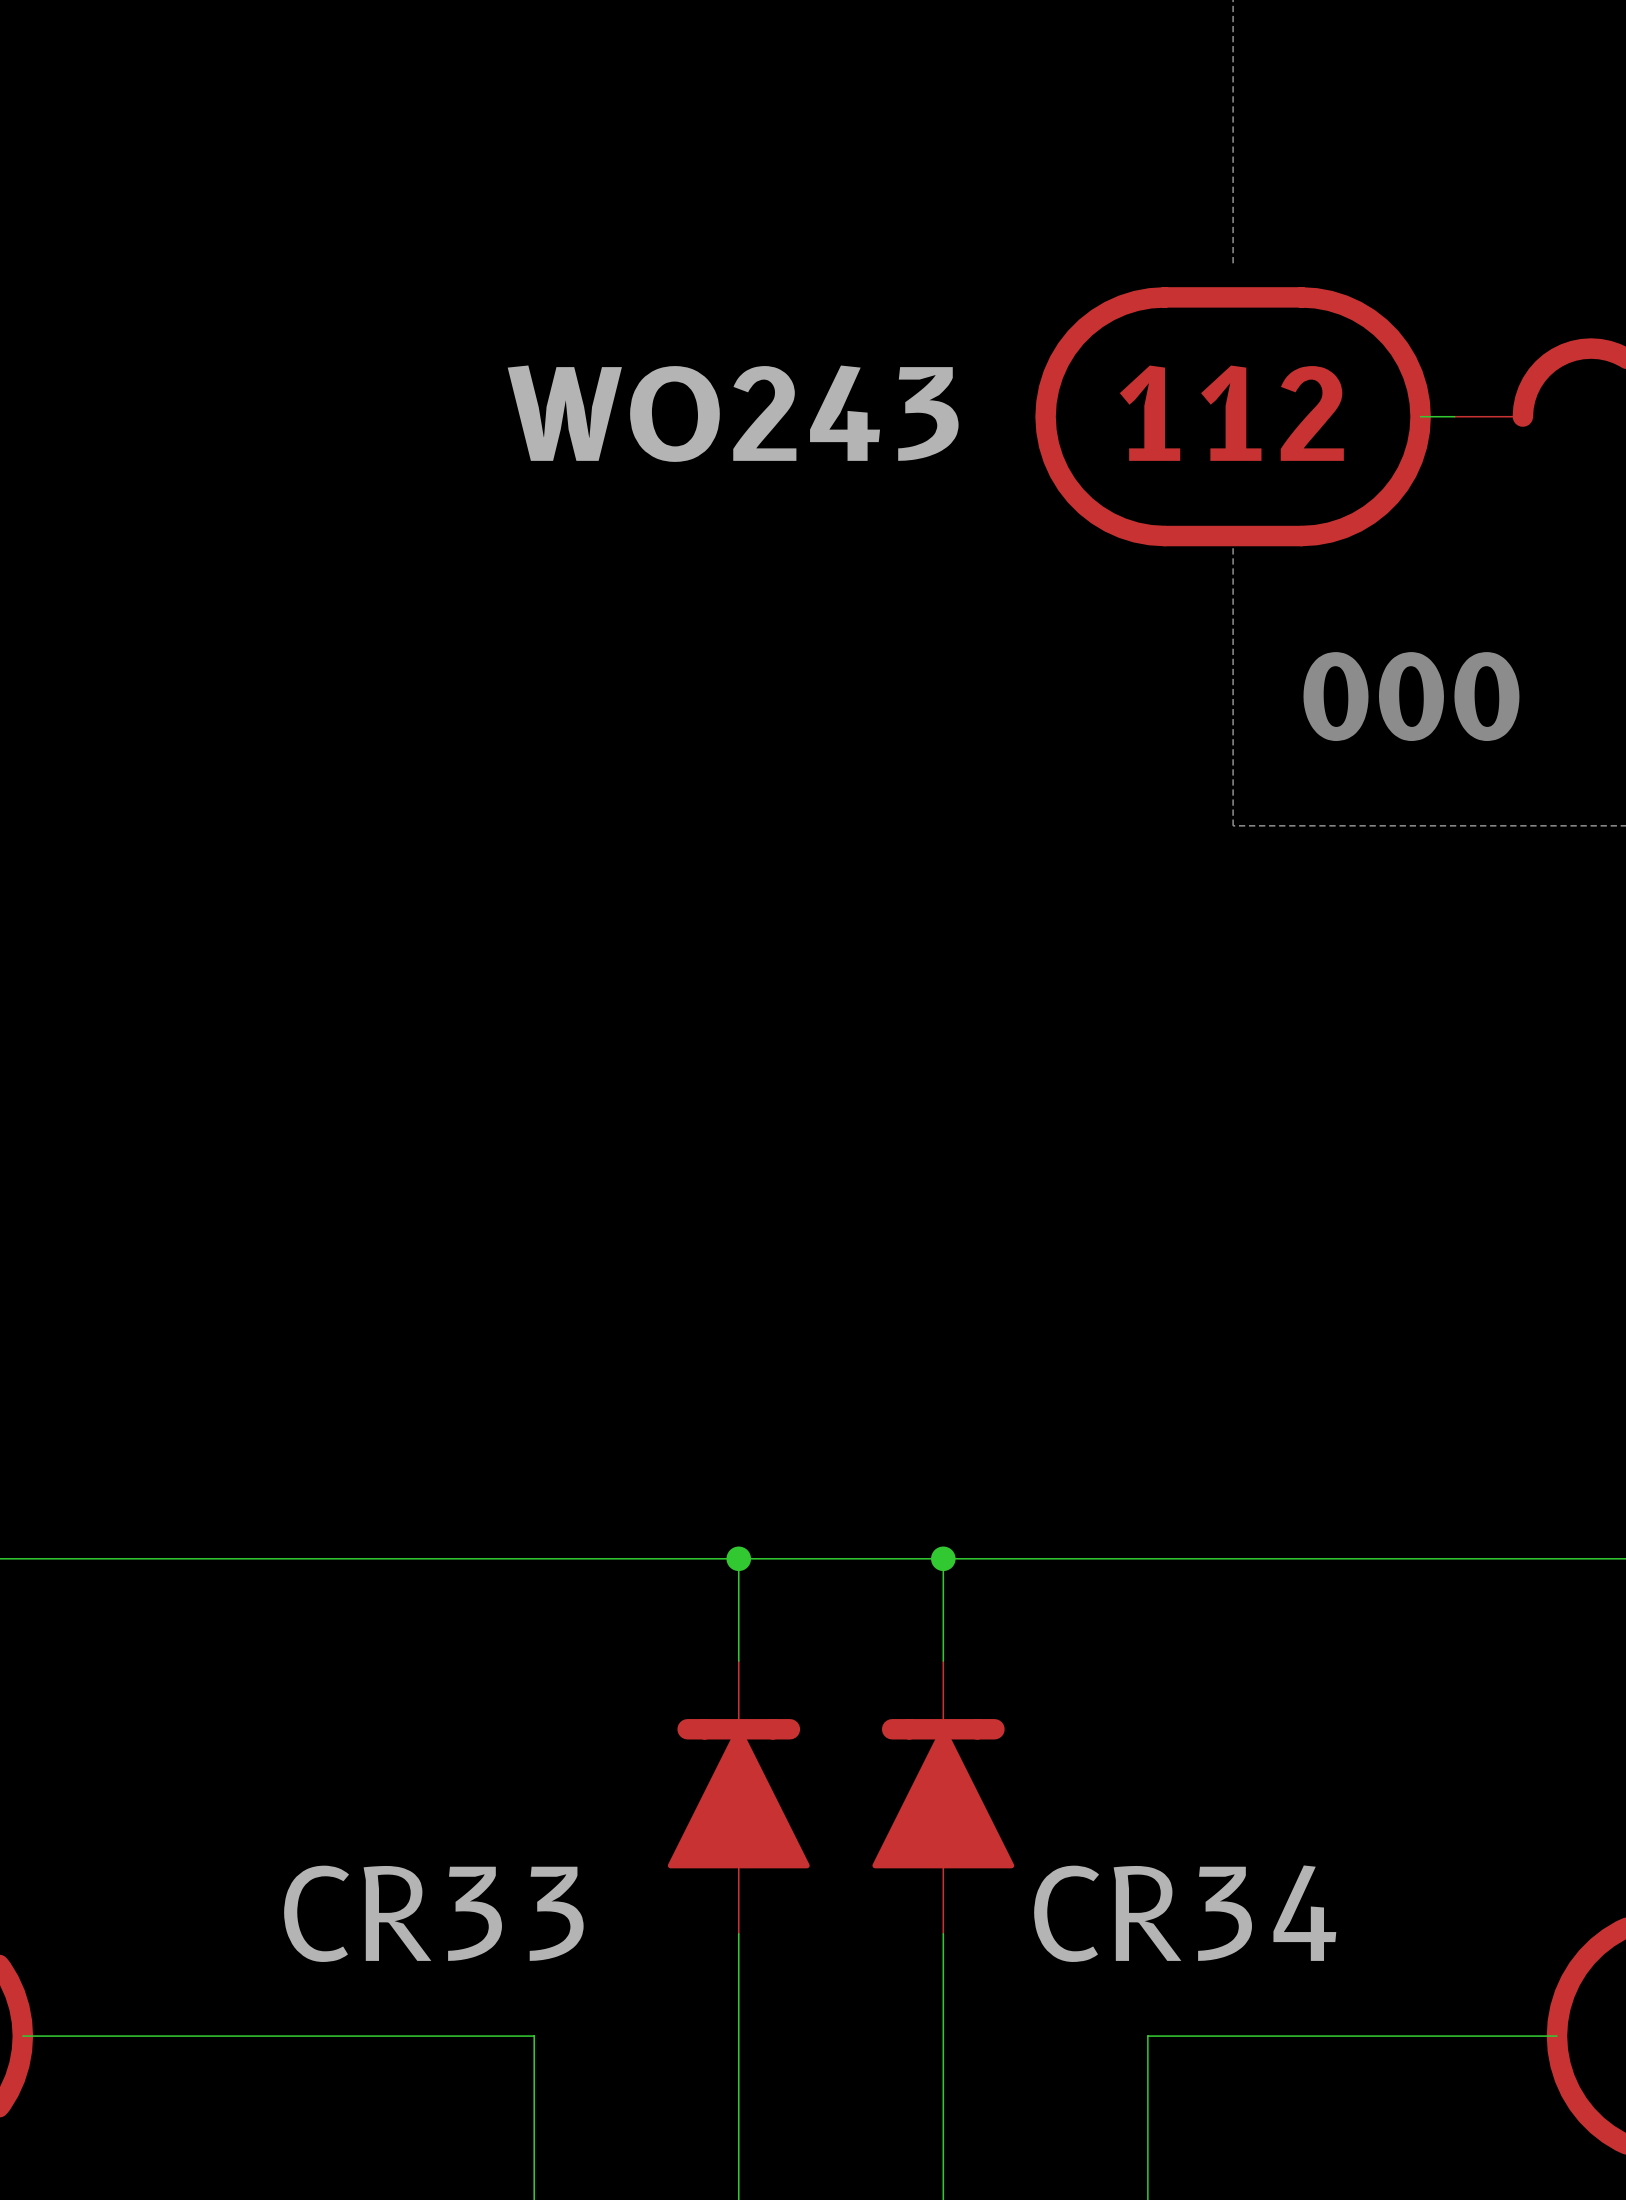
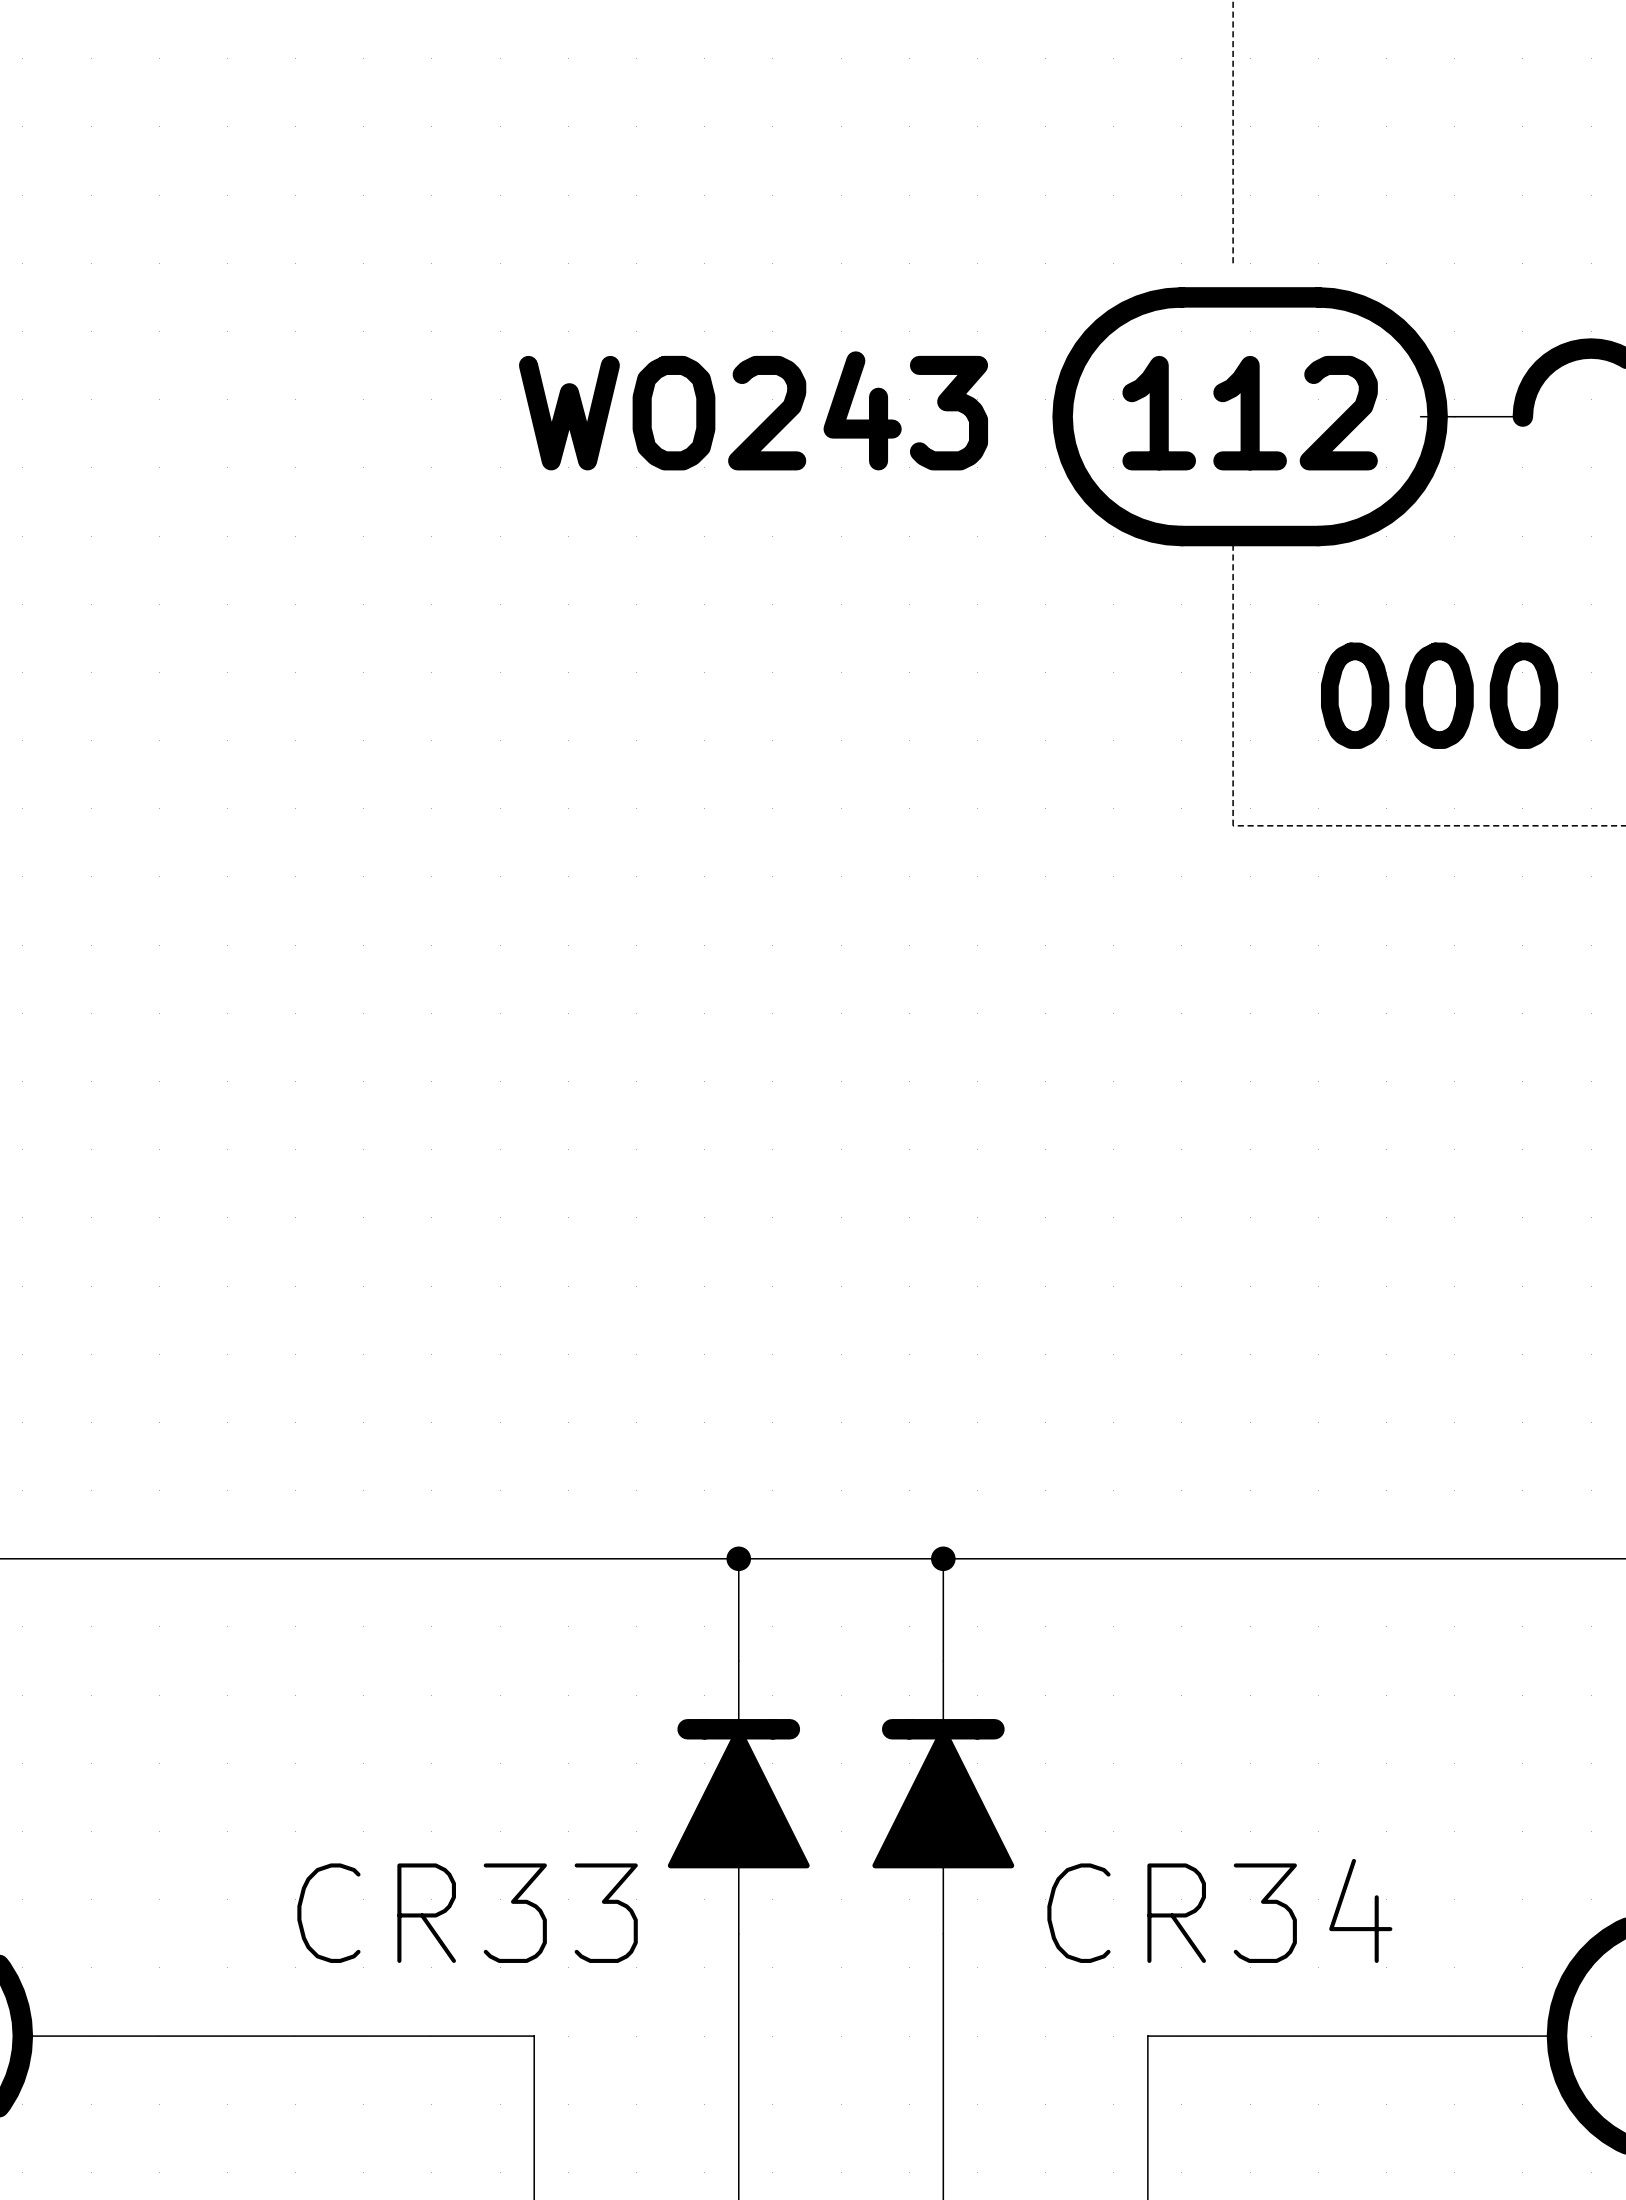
part position: (1233, 416) -> (1250, 416)

